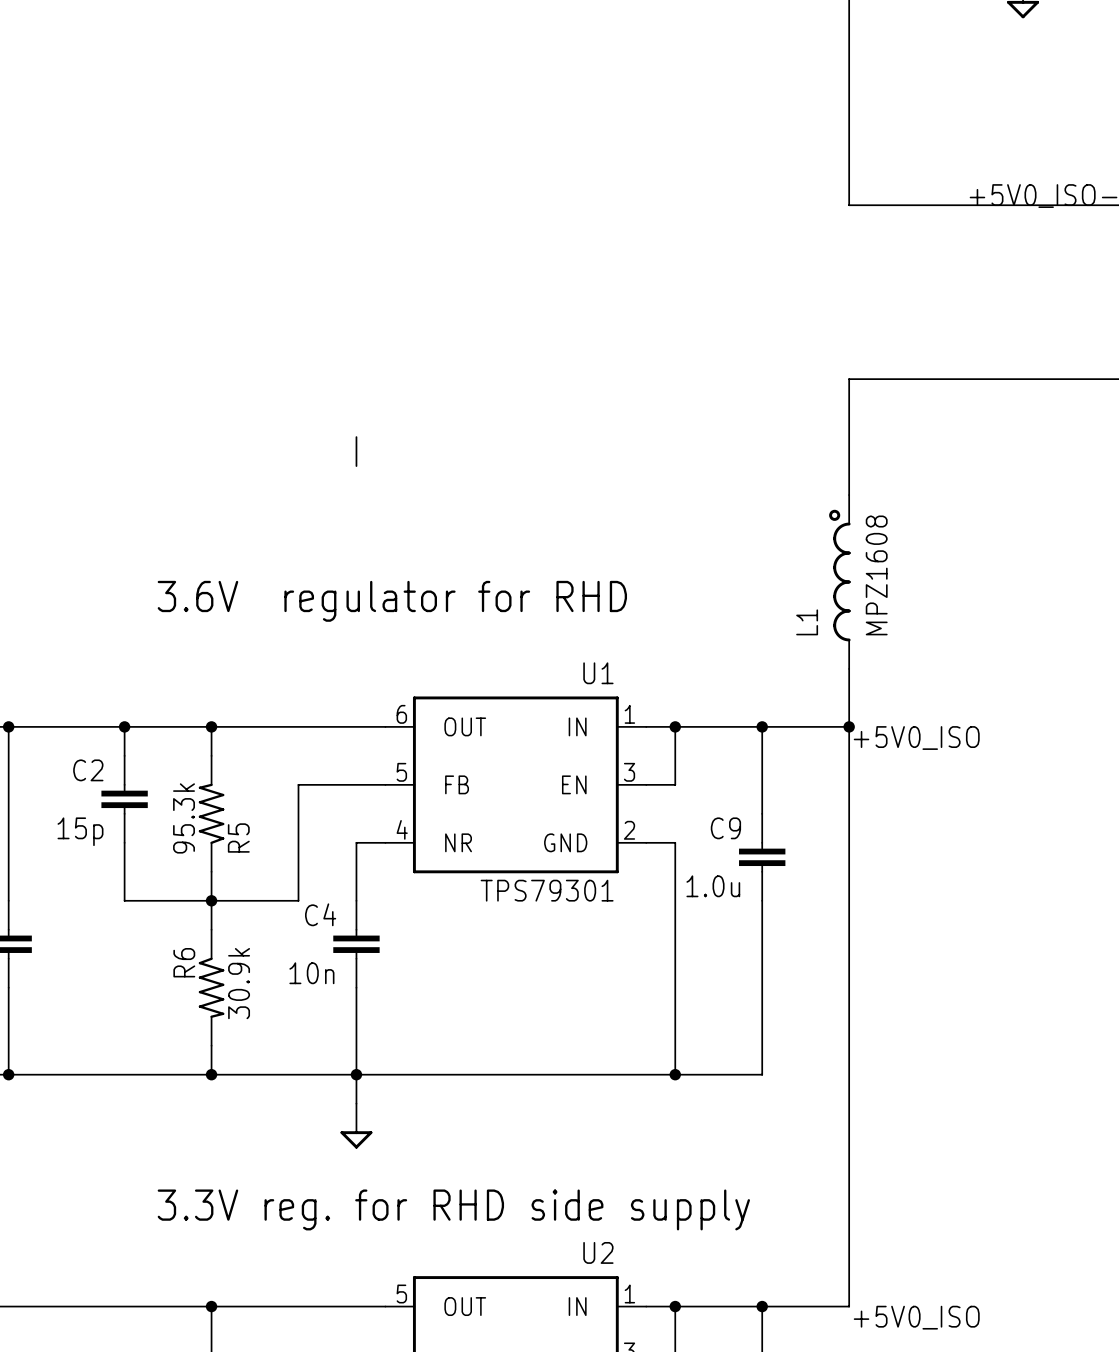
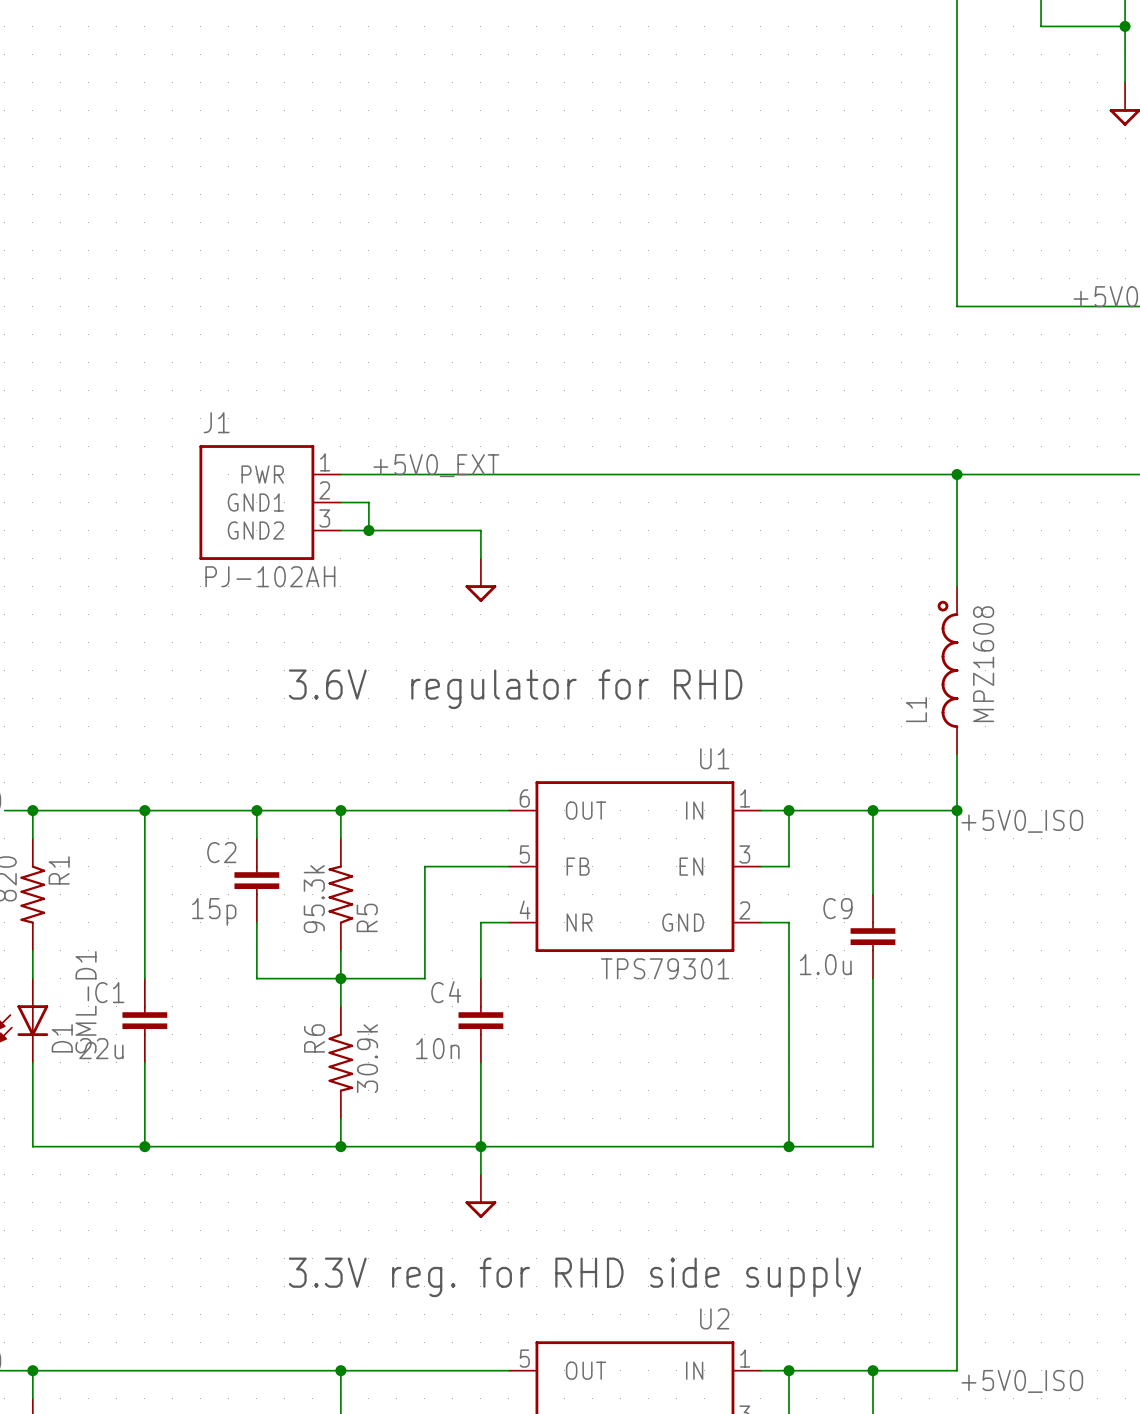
label: none -> +5V0_EXT (436, 465)
wire: none -> (340, 474) (957, 474)
junction: none -> (957, 474)
J1: none -> PJ-102AH (270, 502)
wire: none -> (340, 502) (368, 502) (368, 530)
wire: none -> (340, 530) (480, 530)
junction: none -> (368, 530)
power symbol: none -> (480, 580)

